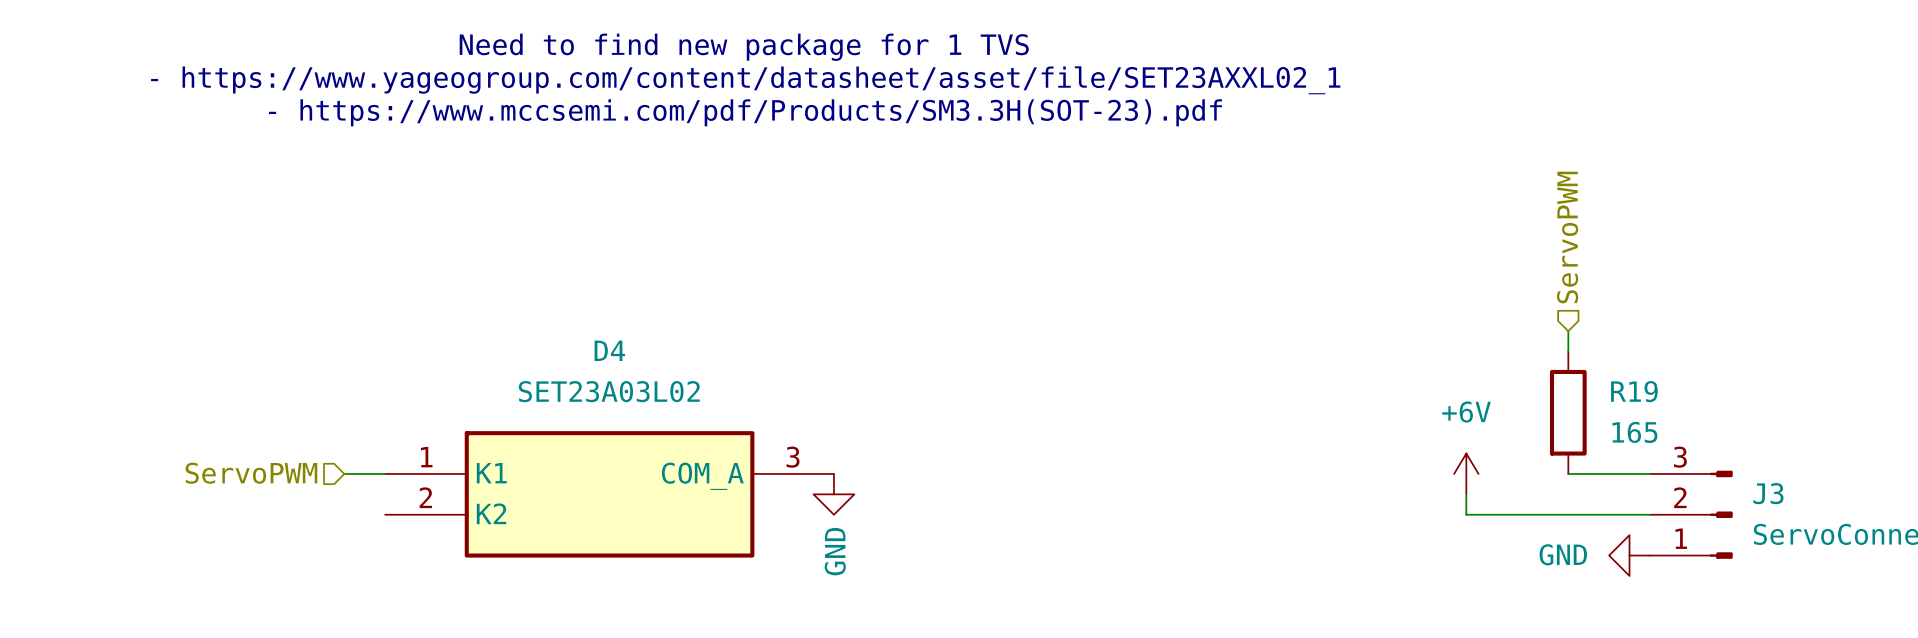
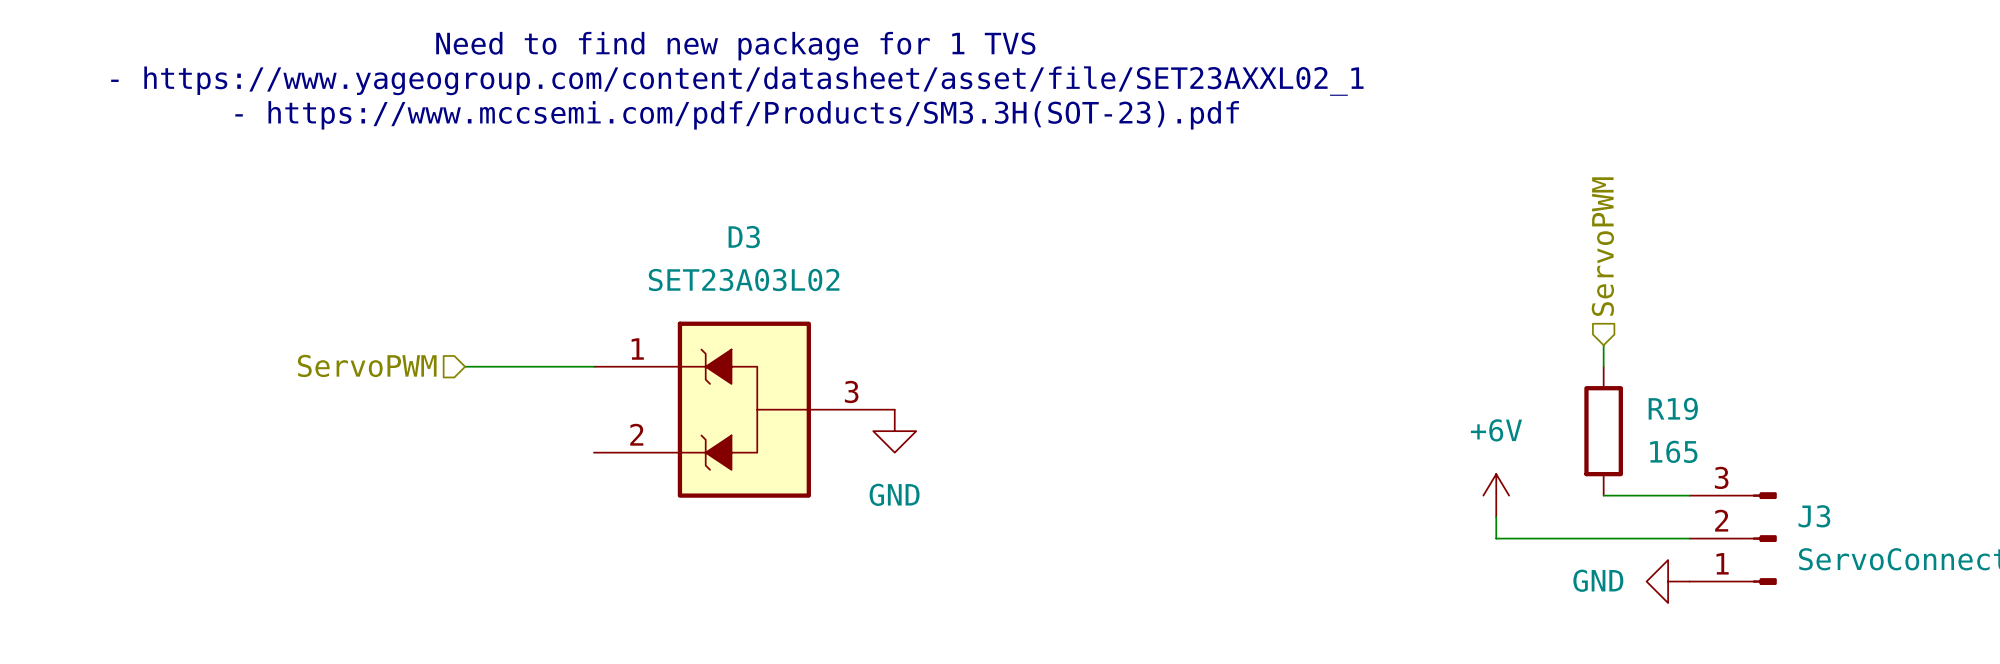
wire: none -> (465, 366) (594, 366)
D3: none -> SET23A03L02 (744, 409)
hierarchical label position: ServoPWM (251, 473) -> ServoPWM (367, 365)
wire: (344, 473) (385, 473) -> none
D4: SET23A03L02 (609, 494) -> none
power symbol position: GND (833, 494) -> GND (894, 431)
power symbol text rotation: 0° (835, 551) -> 90° clockwise (894, 494)

